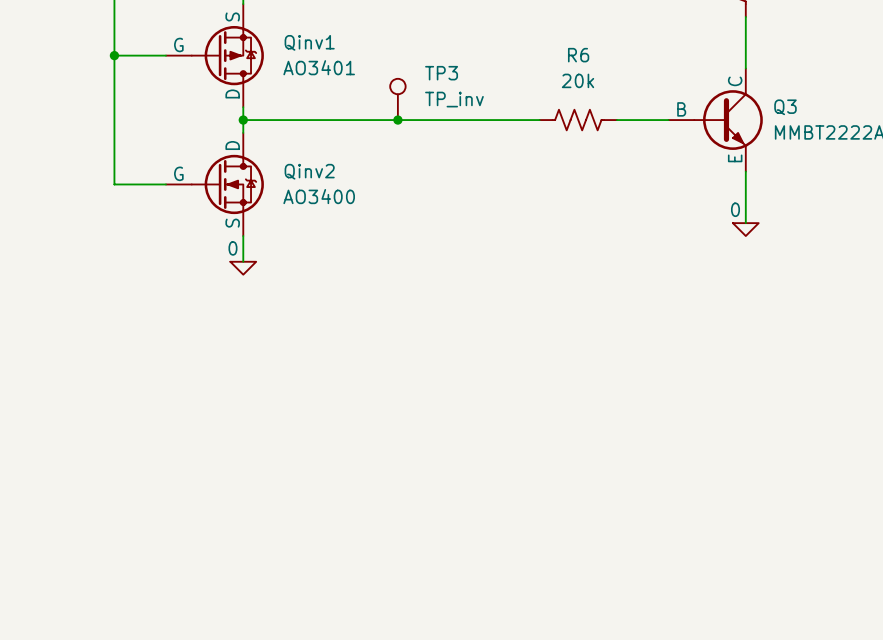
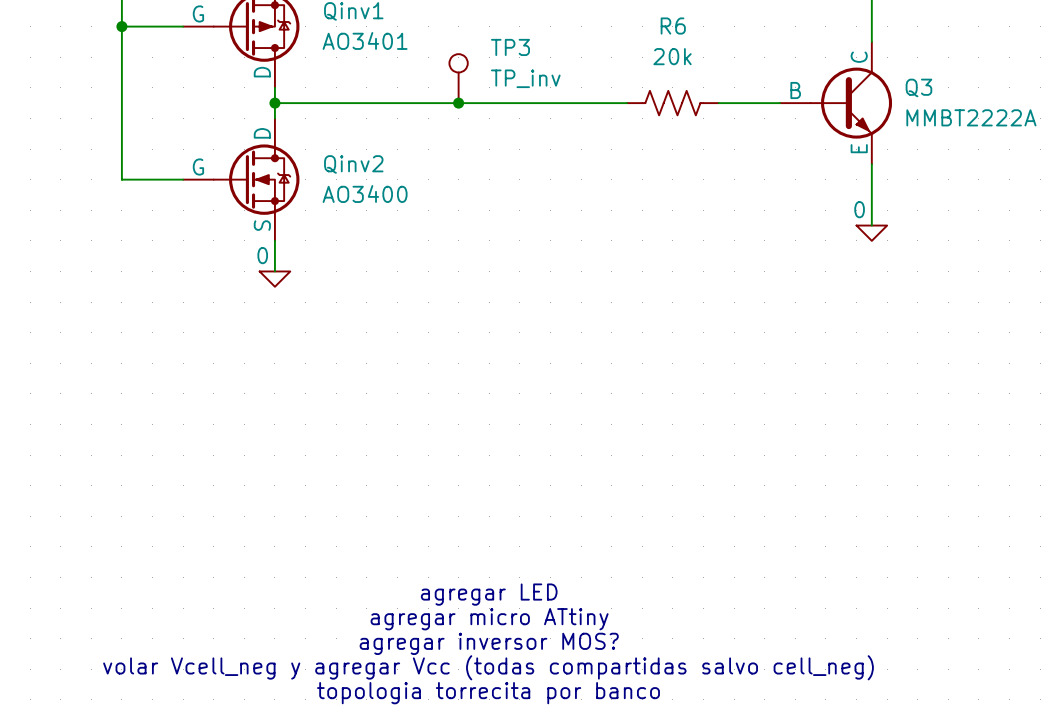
text: none -> agregar LED (489, 594)
text: none -> agregar micro ATtiny (489, 619)
text: none -> agregar inversor MOS? (489, 643)
text: none -> volar Vcell_neg y agregar Vcc (todas compartidas salvo cell_neg) (488, 667)
text: none -> topologia torrecita por banco (488, 693)

